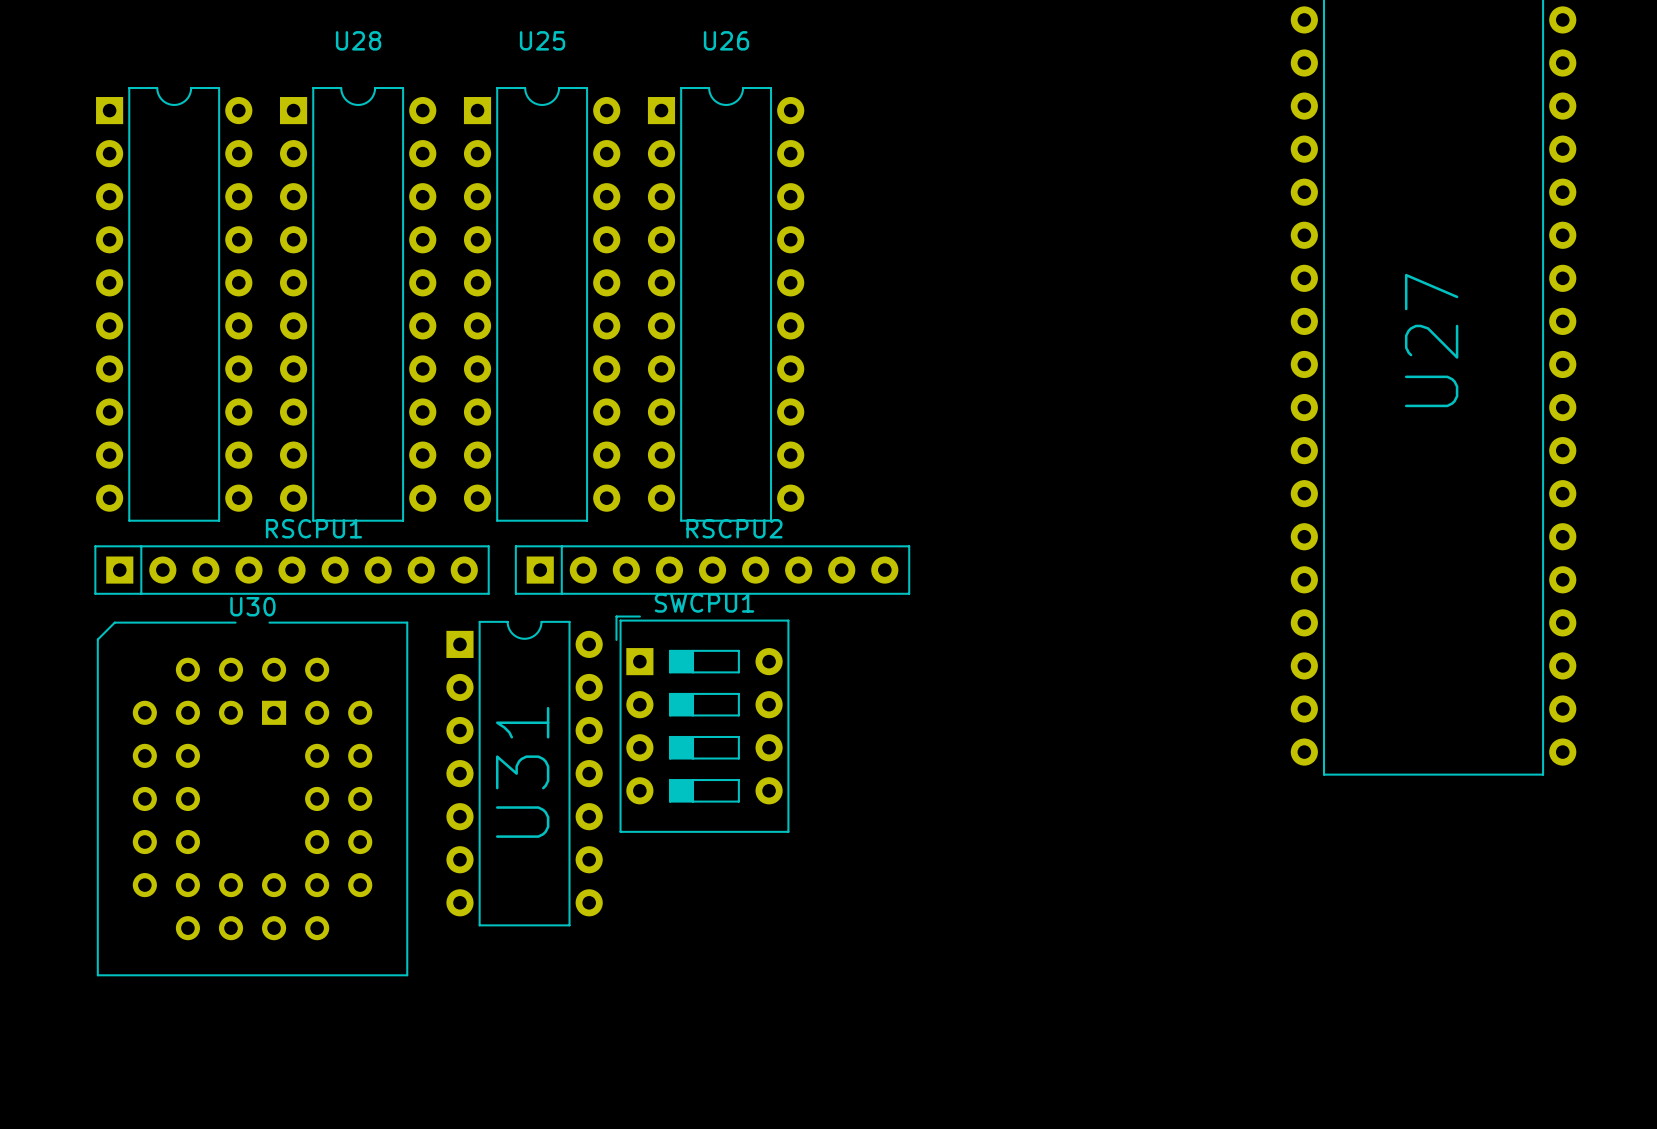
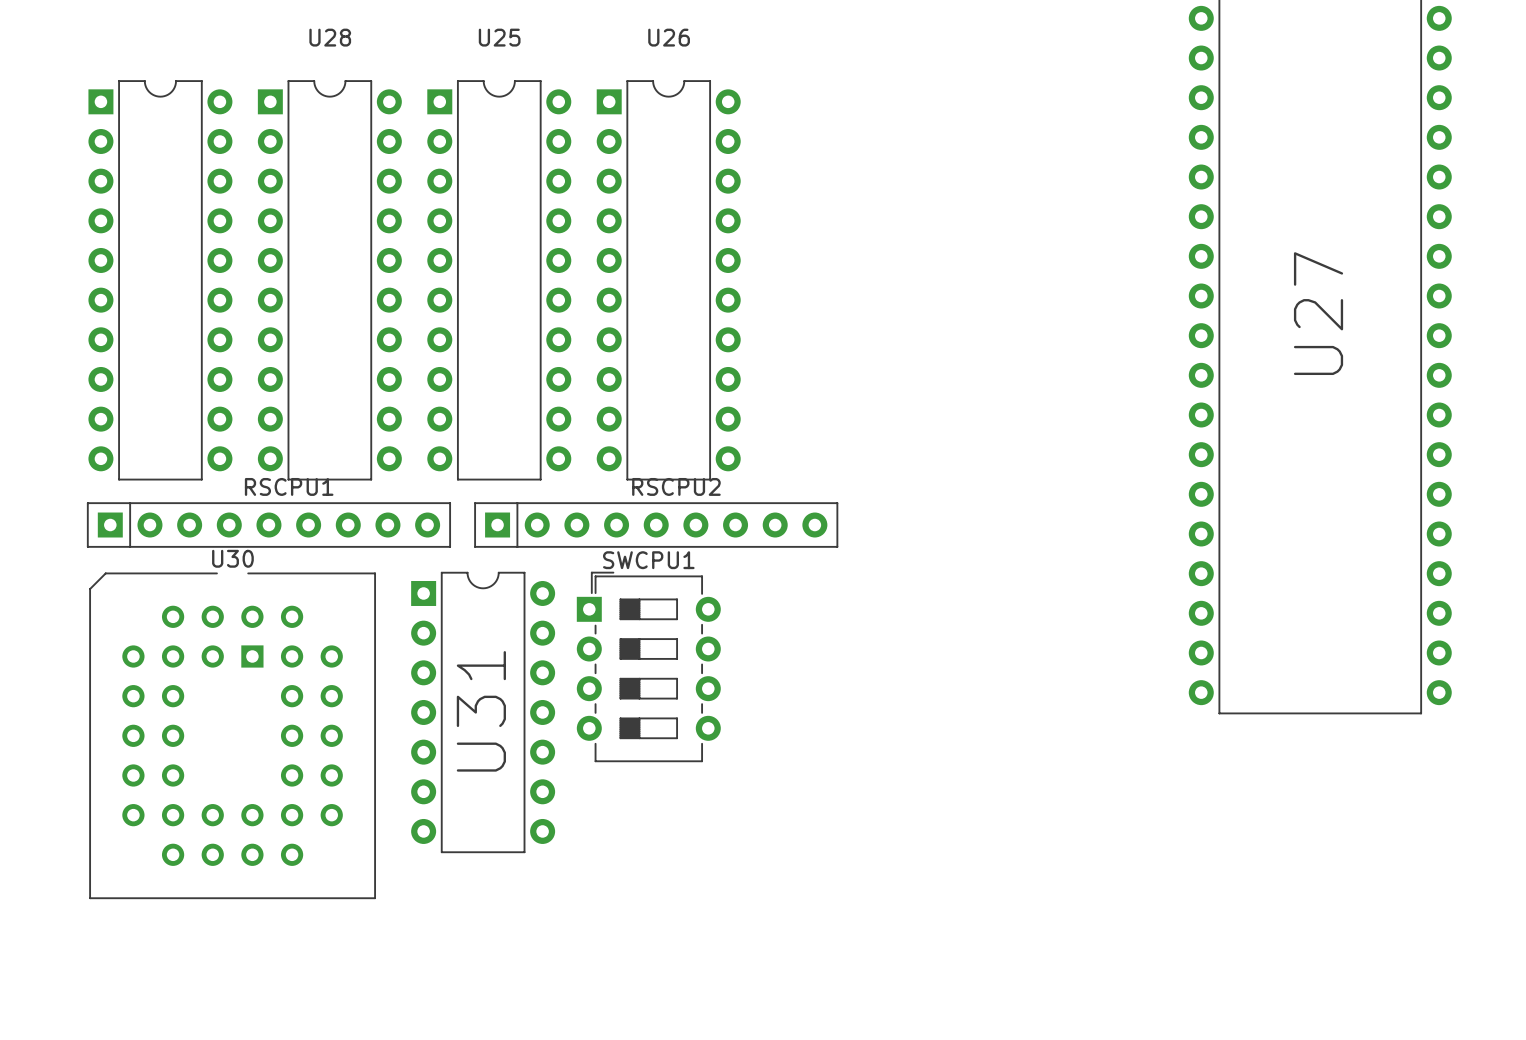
SWCPU1 footprint: [615, 615, 790, 833] -> [576, 571, 721, 763]

